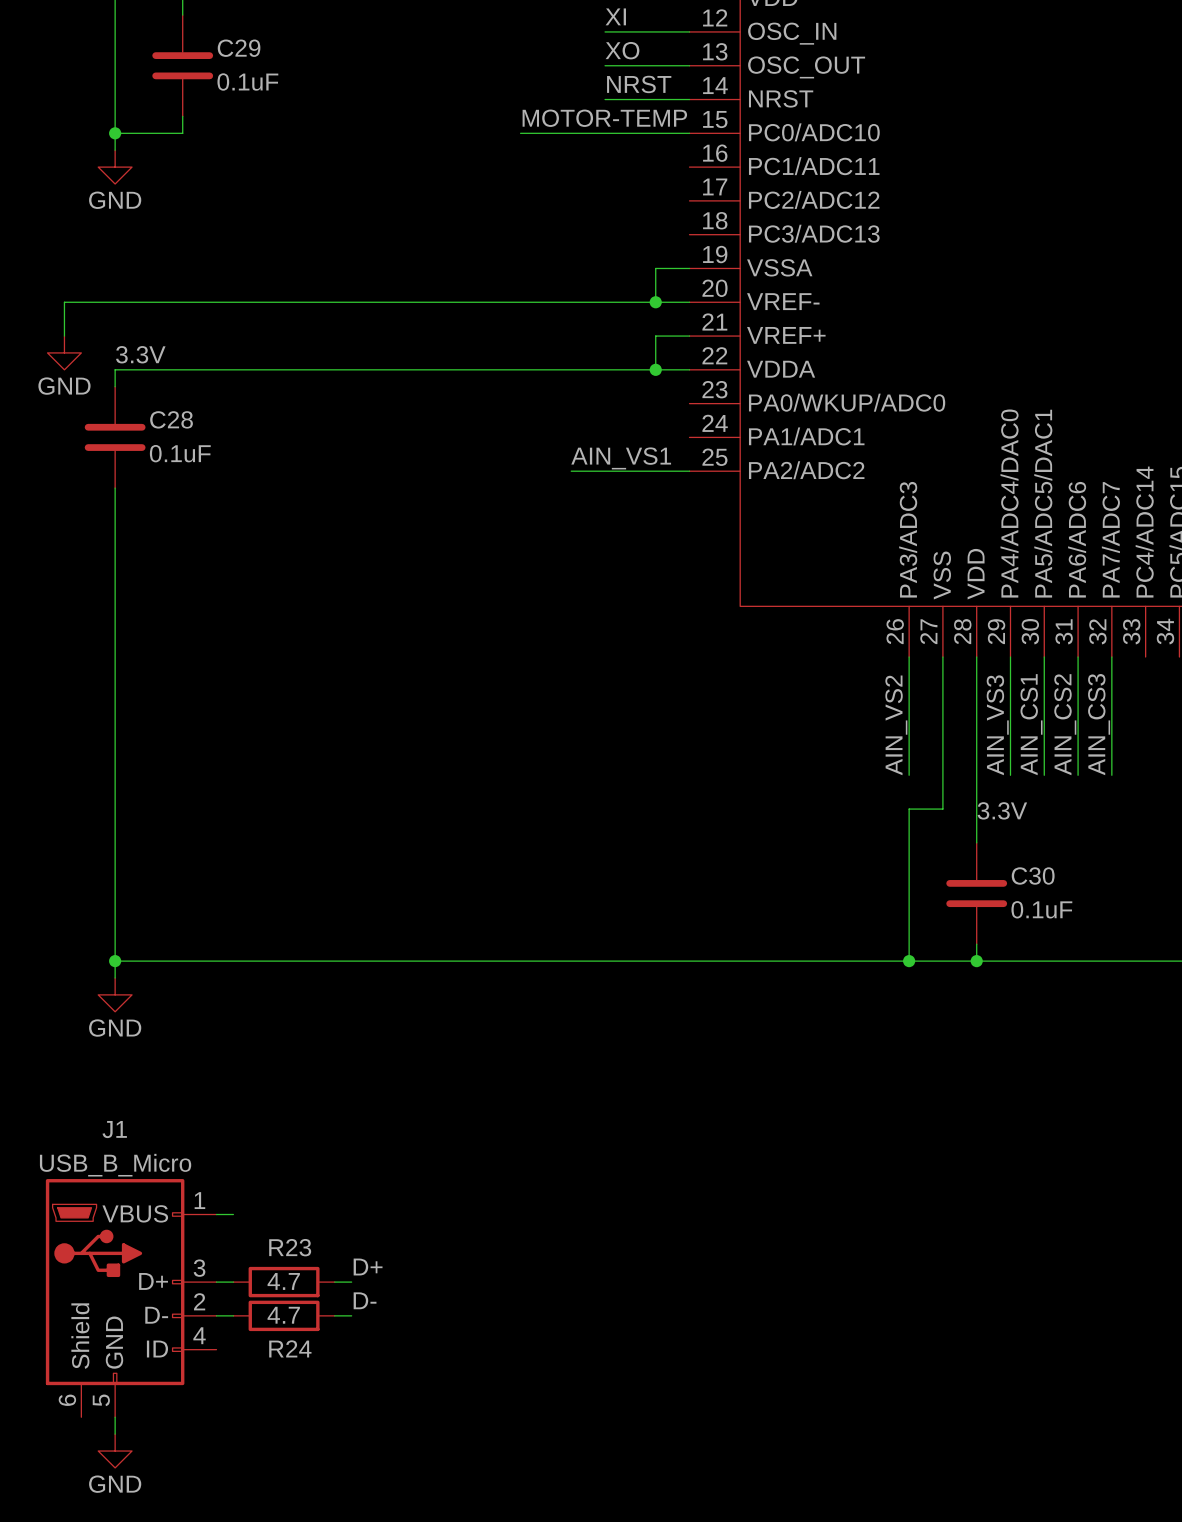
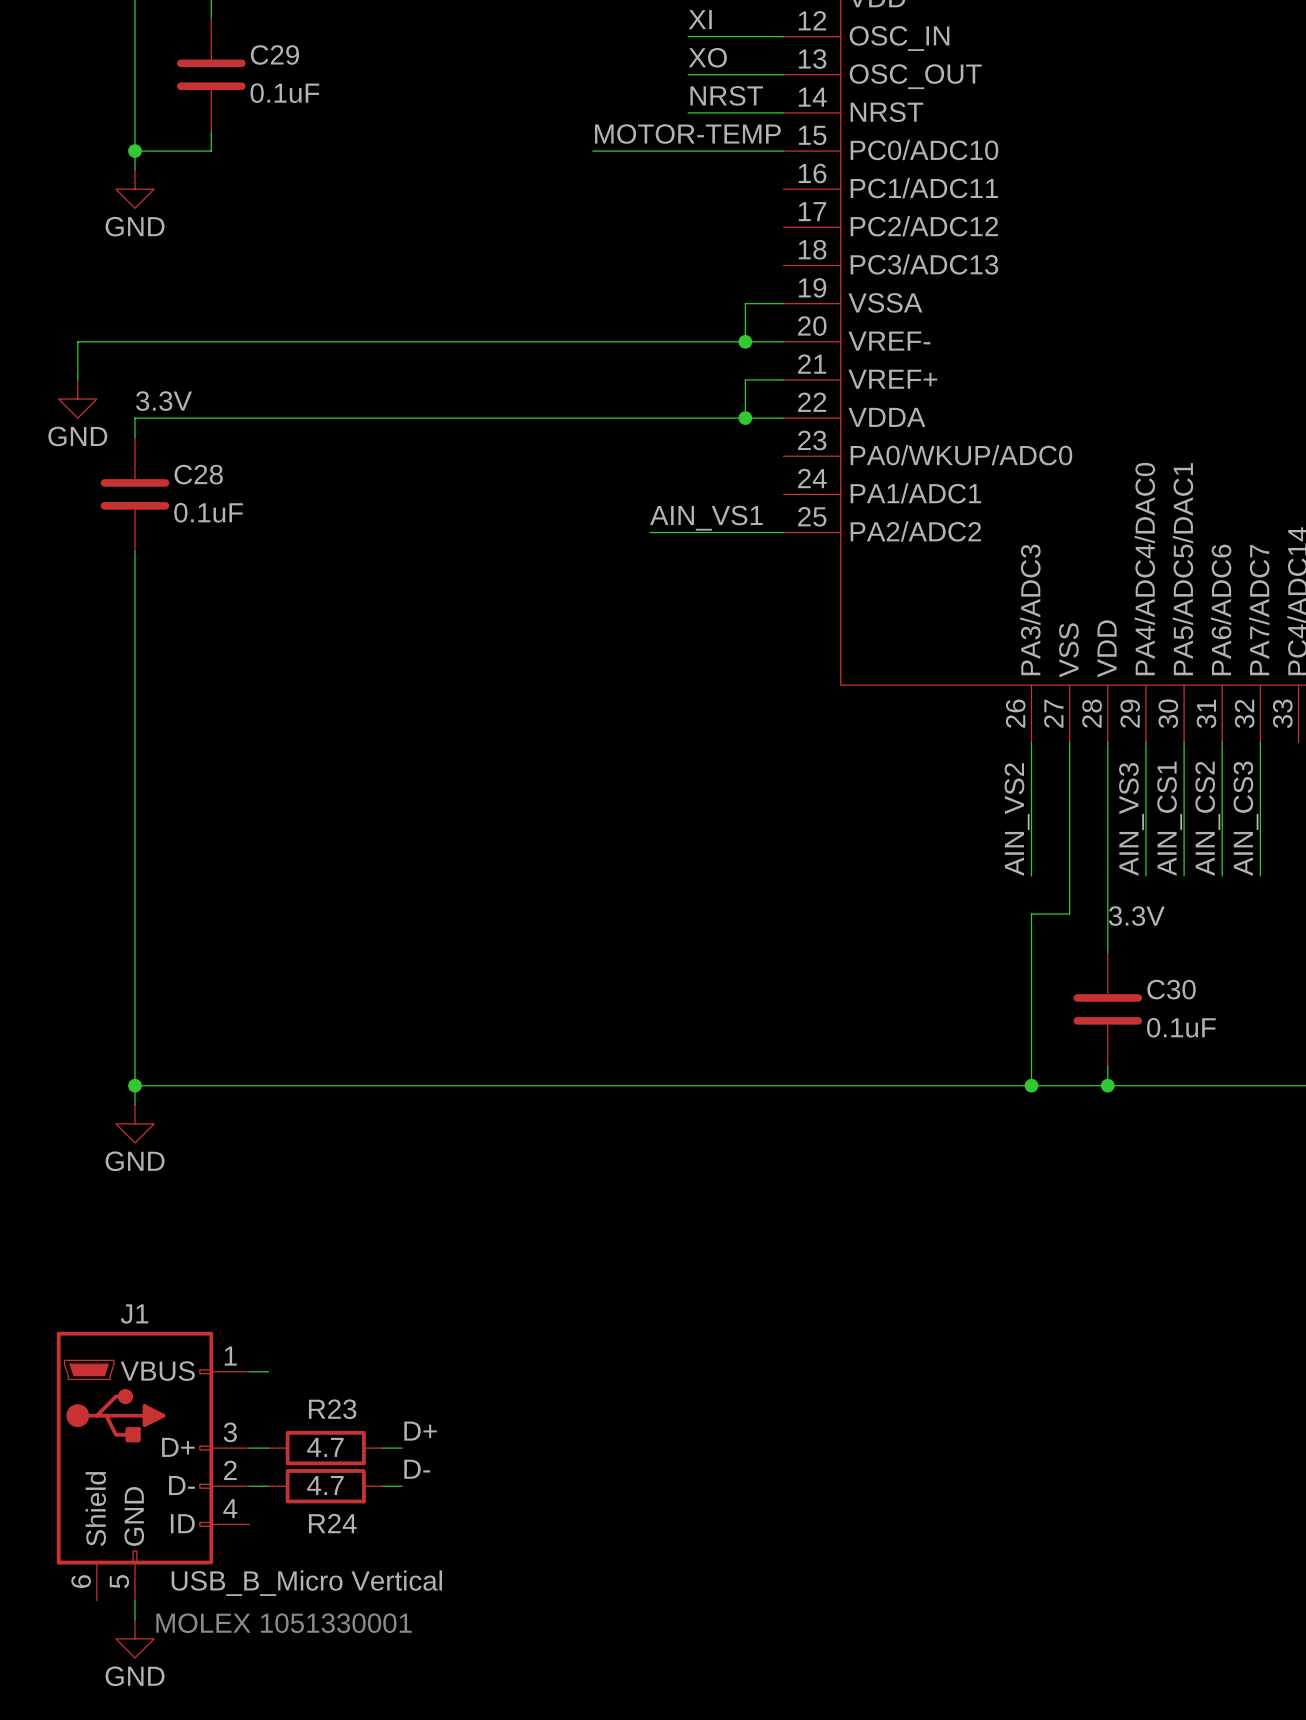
J1 name position: J1 (114, 1129) -> J1 (134, 1314)
J1 value: USB_B_Micro (115, 1165) -> USB_B_Micro Vertical (306, 1583)
text: none -> MOLEX 1051330001 (284, 1623)

